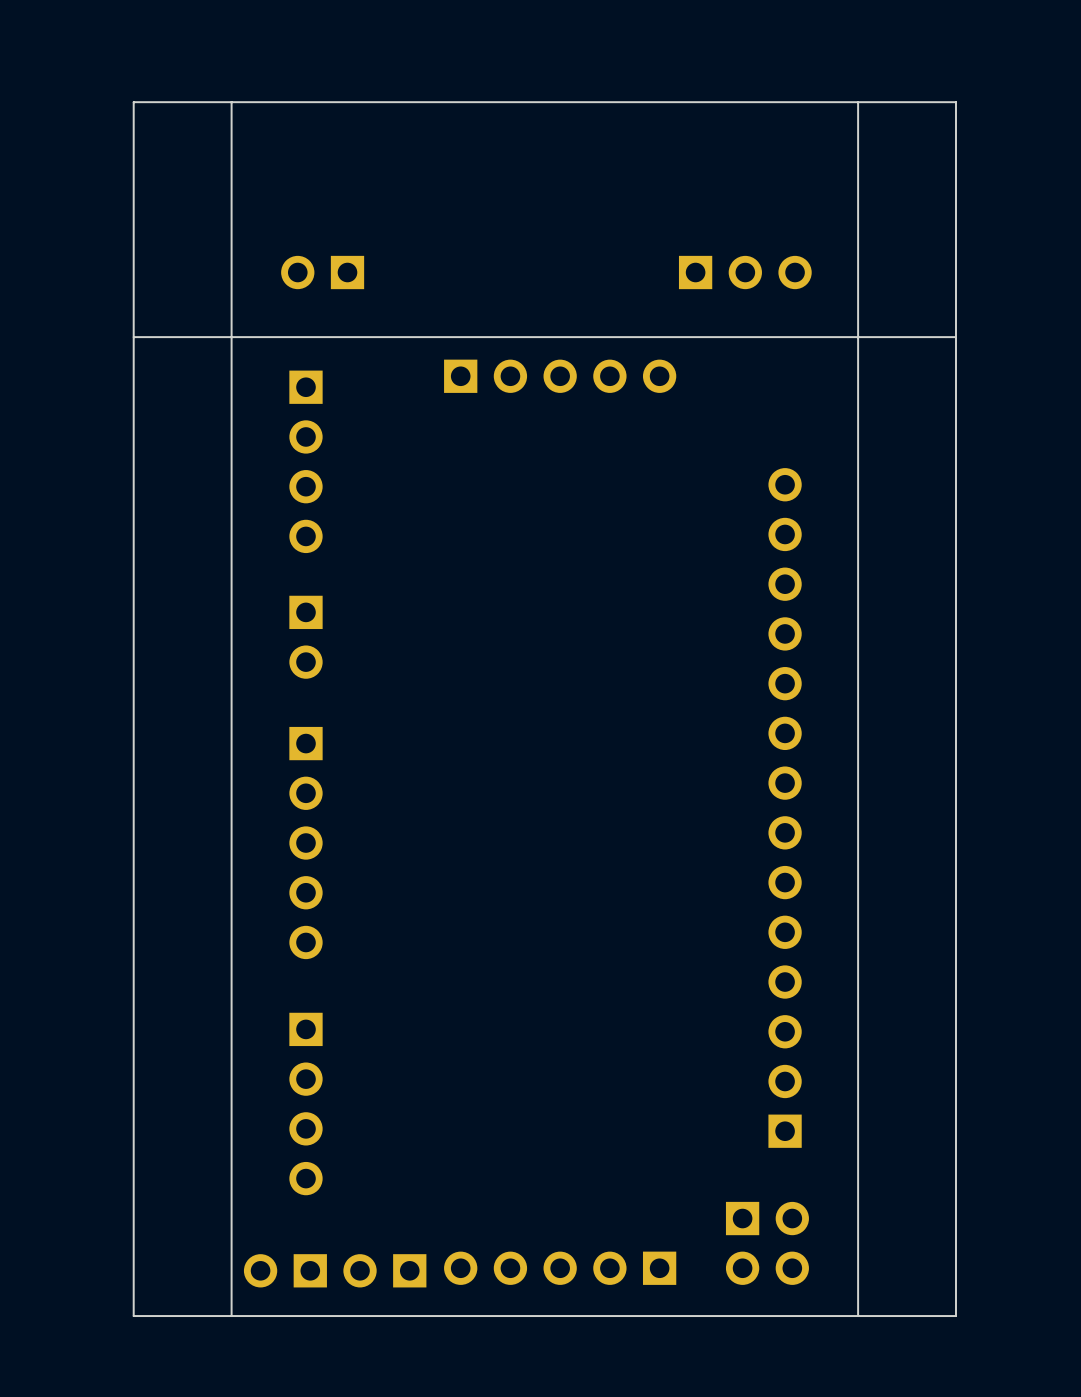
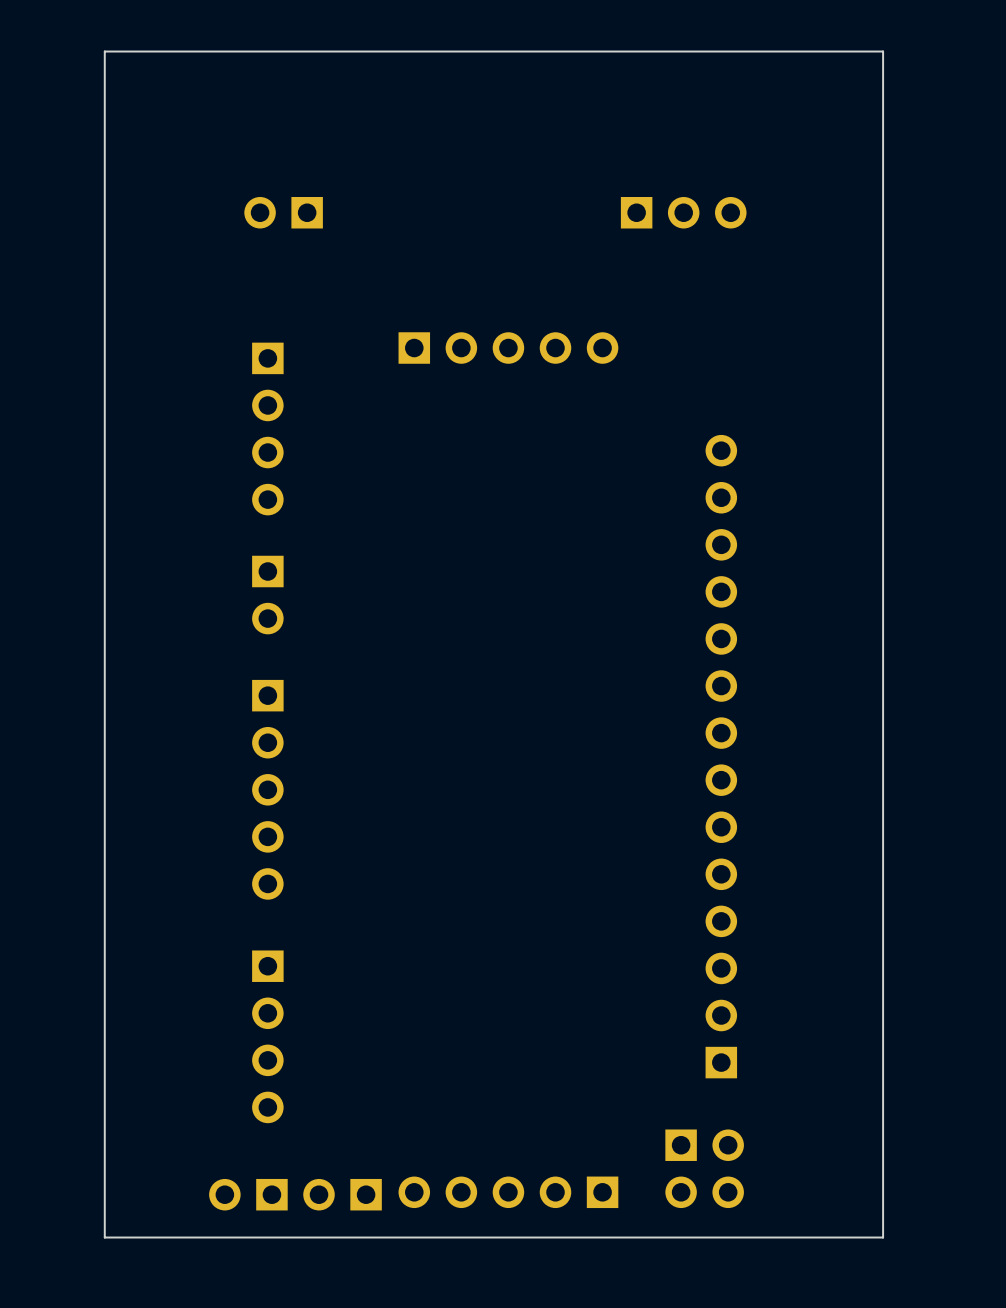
board edge: (231, 102) (231, 1316) -> none
board edge: (858, 102) (858, 1316) -> none
board edge: (955, 102) (133, 102) -> (883, 88) (883, 51) (104, 51) (104, 88)
part position: (322, 272) -> (283, 212)
part position: (745, 272) -> (683, 212)
board edge: (955, 337) (133, 337) -> none

